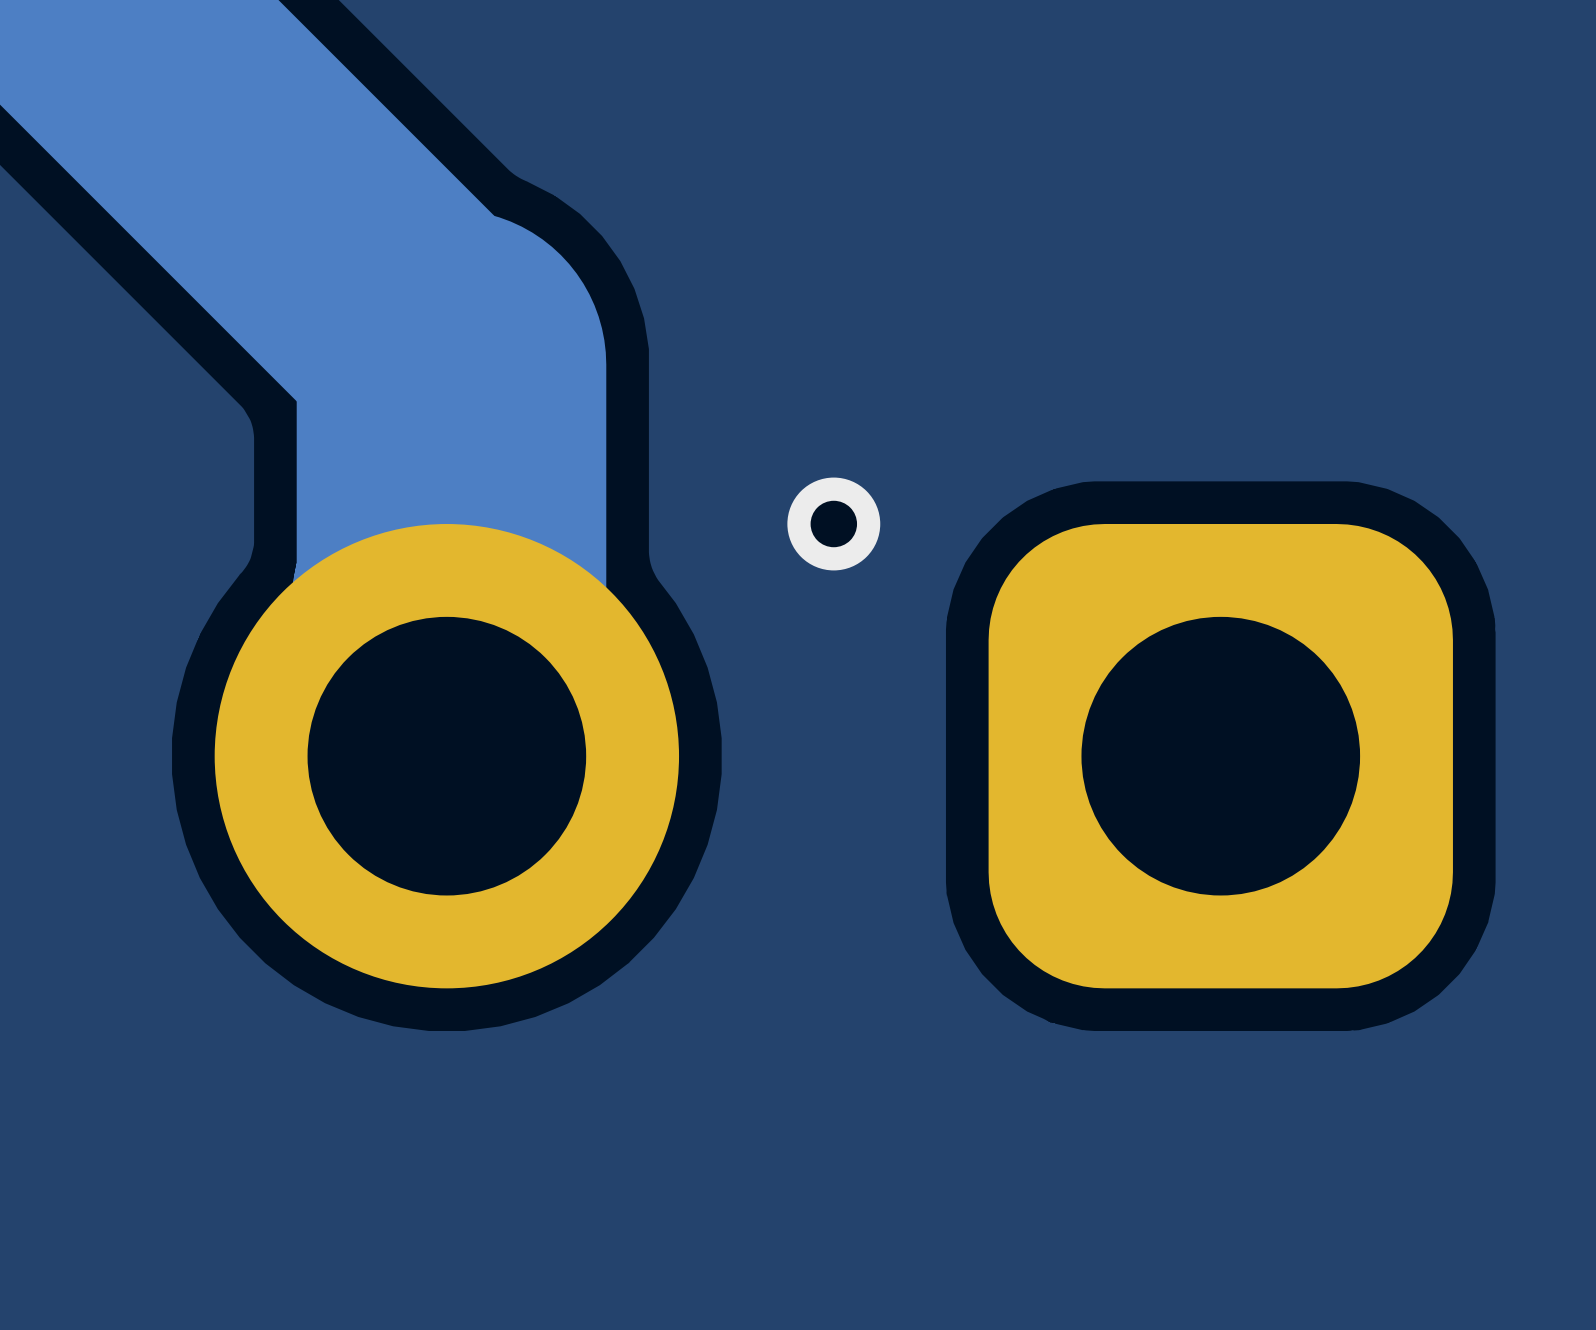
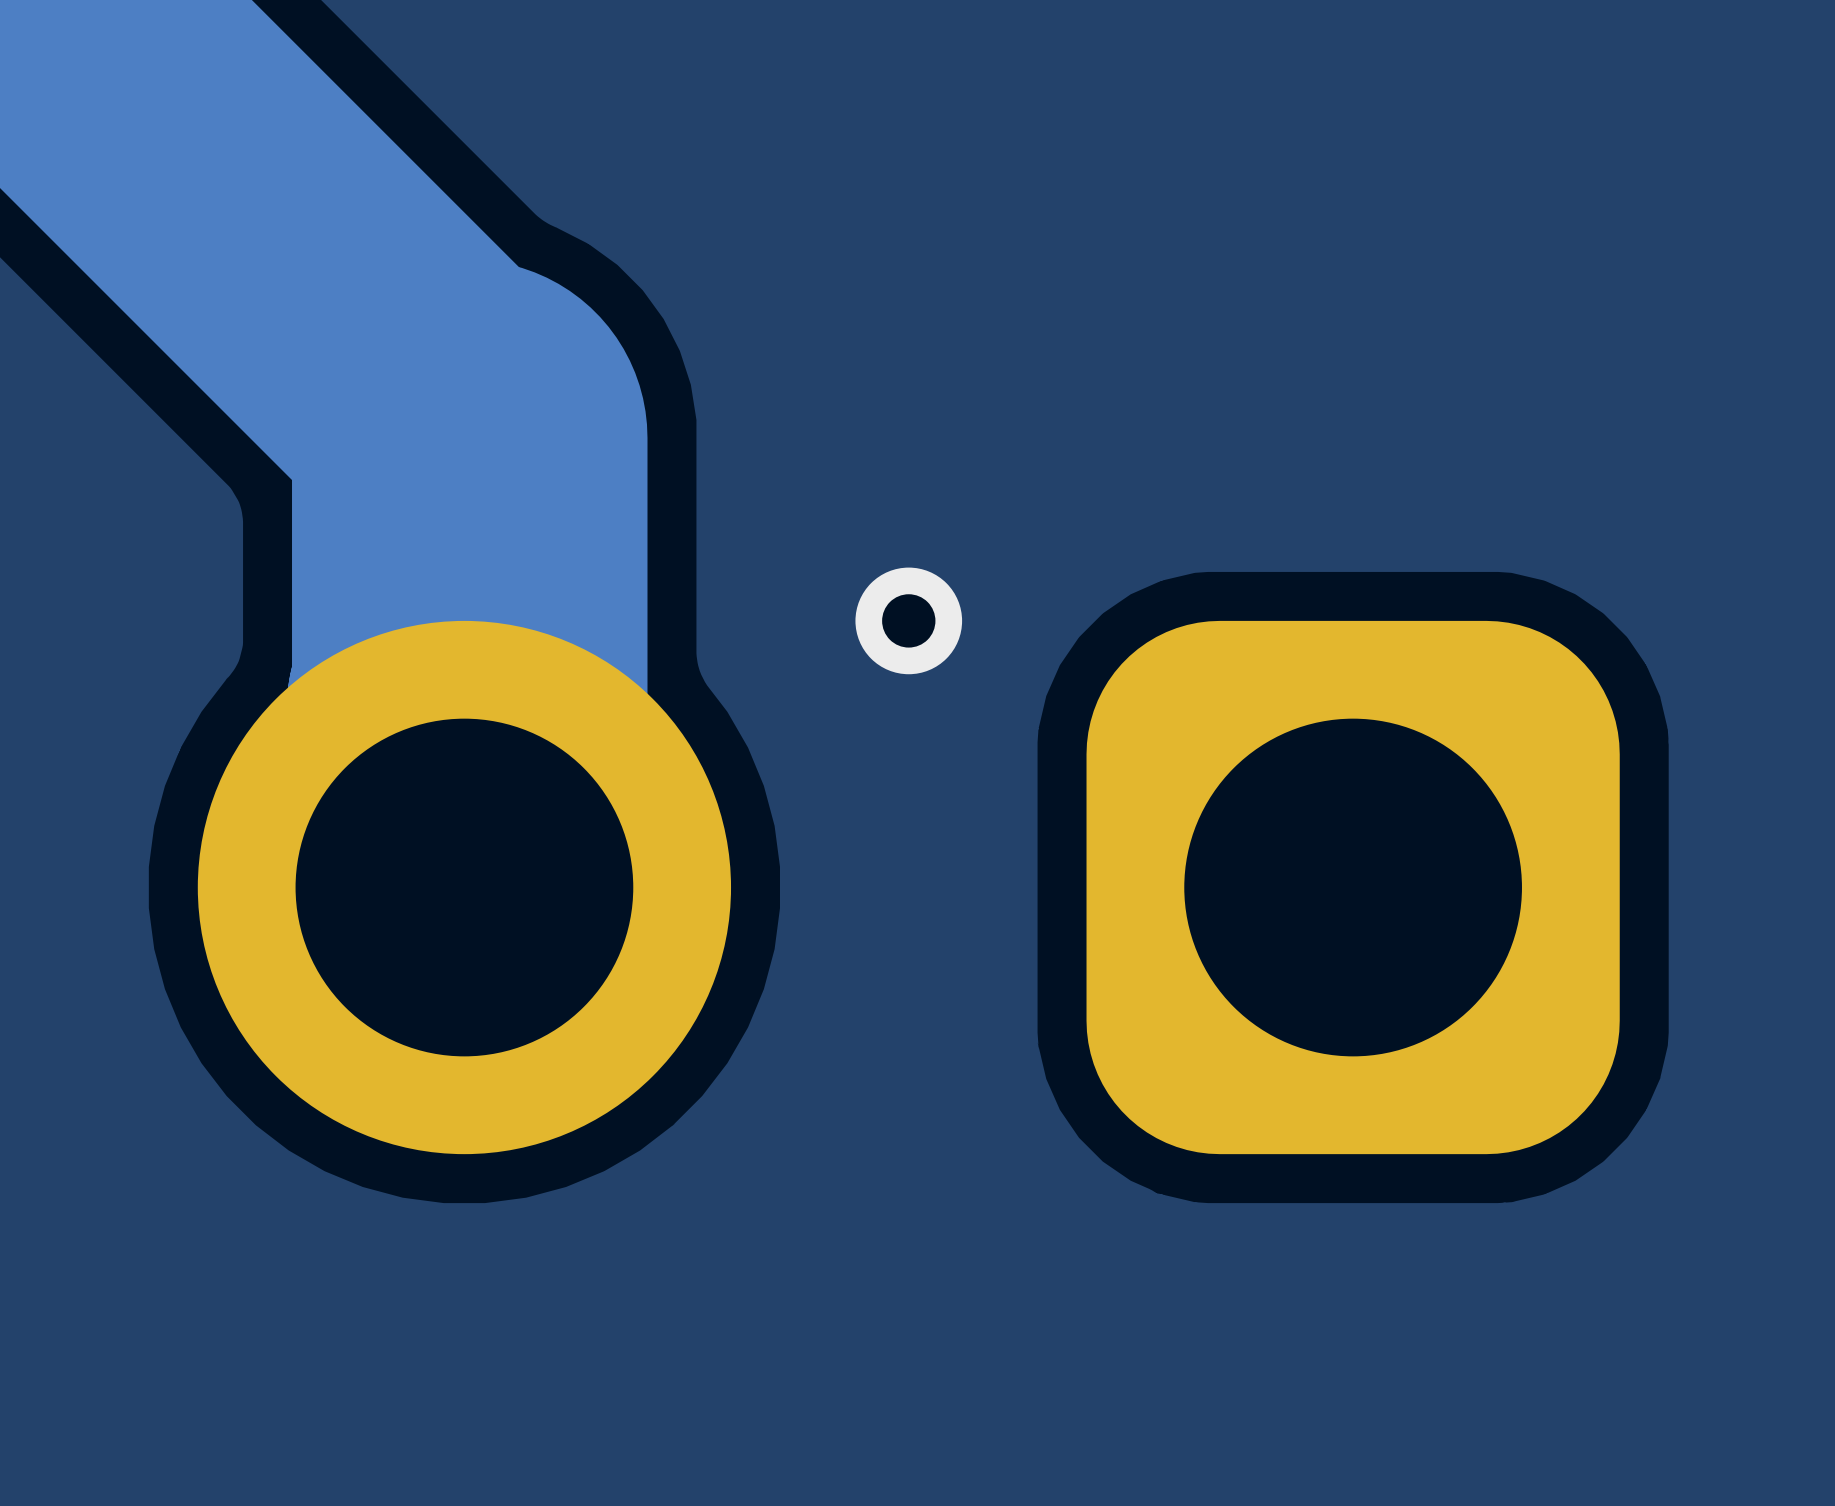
part footprint: [214, 524, 1453, 989] -> [197, 620, 1620, 1155]

